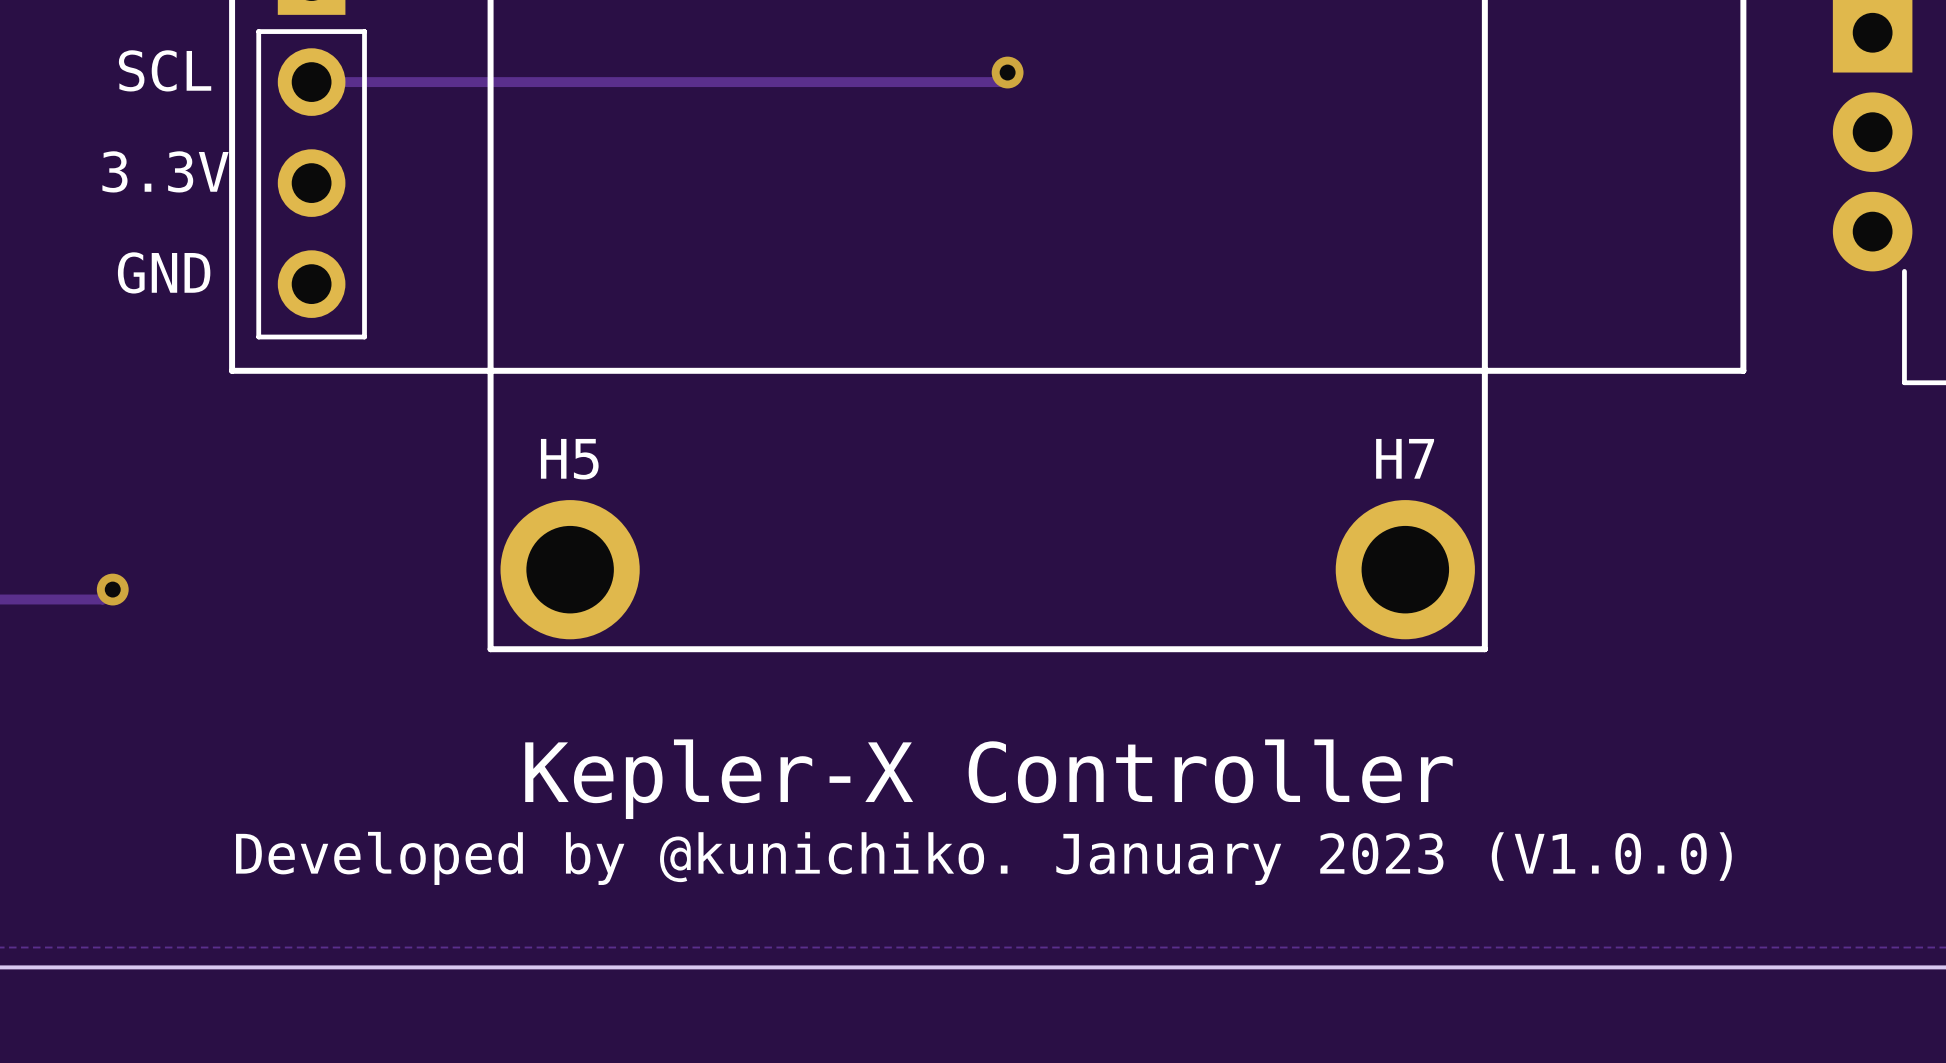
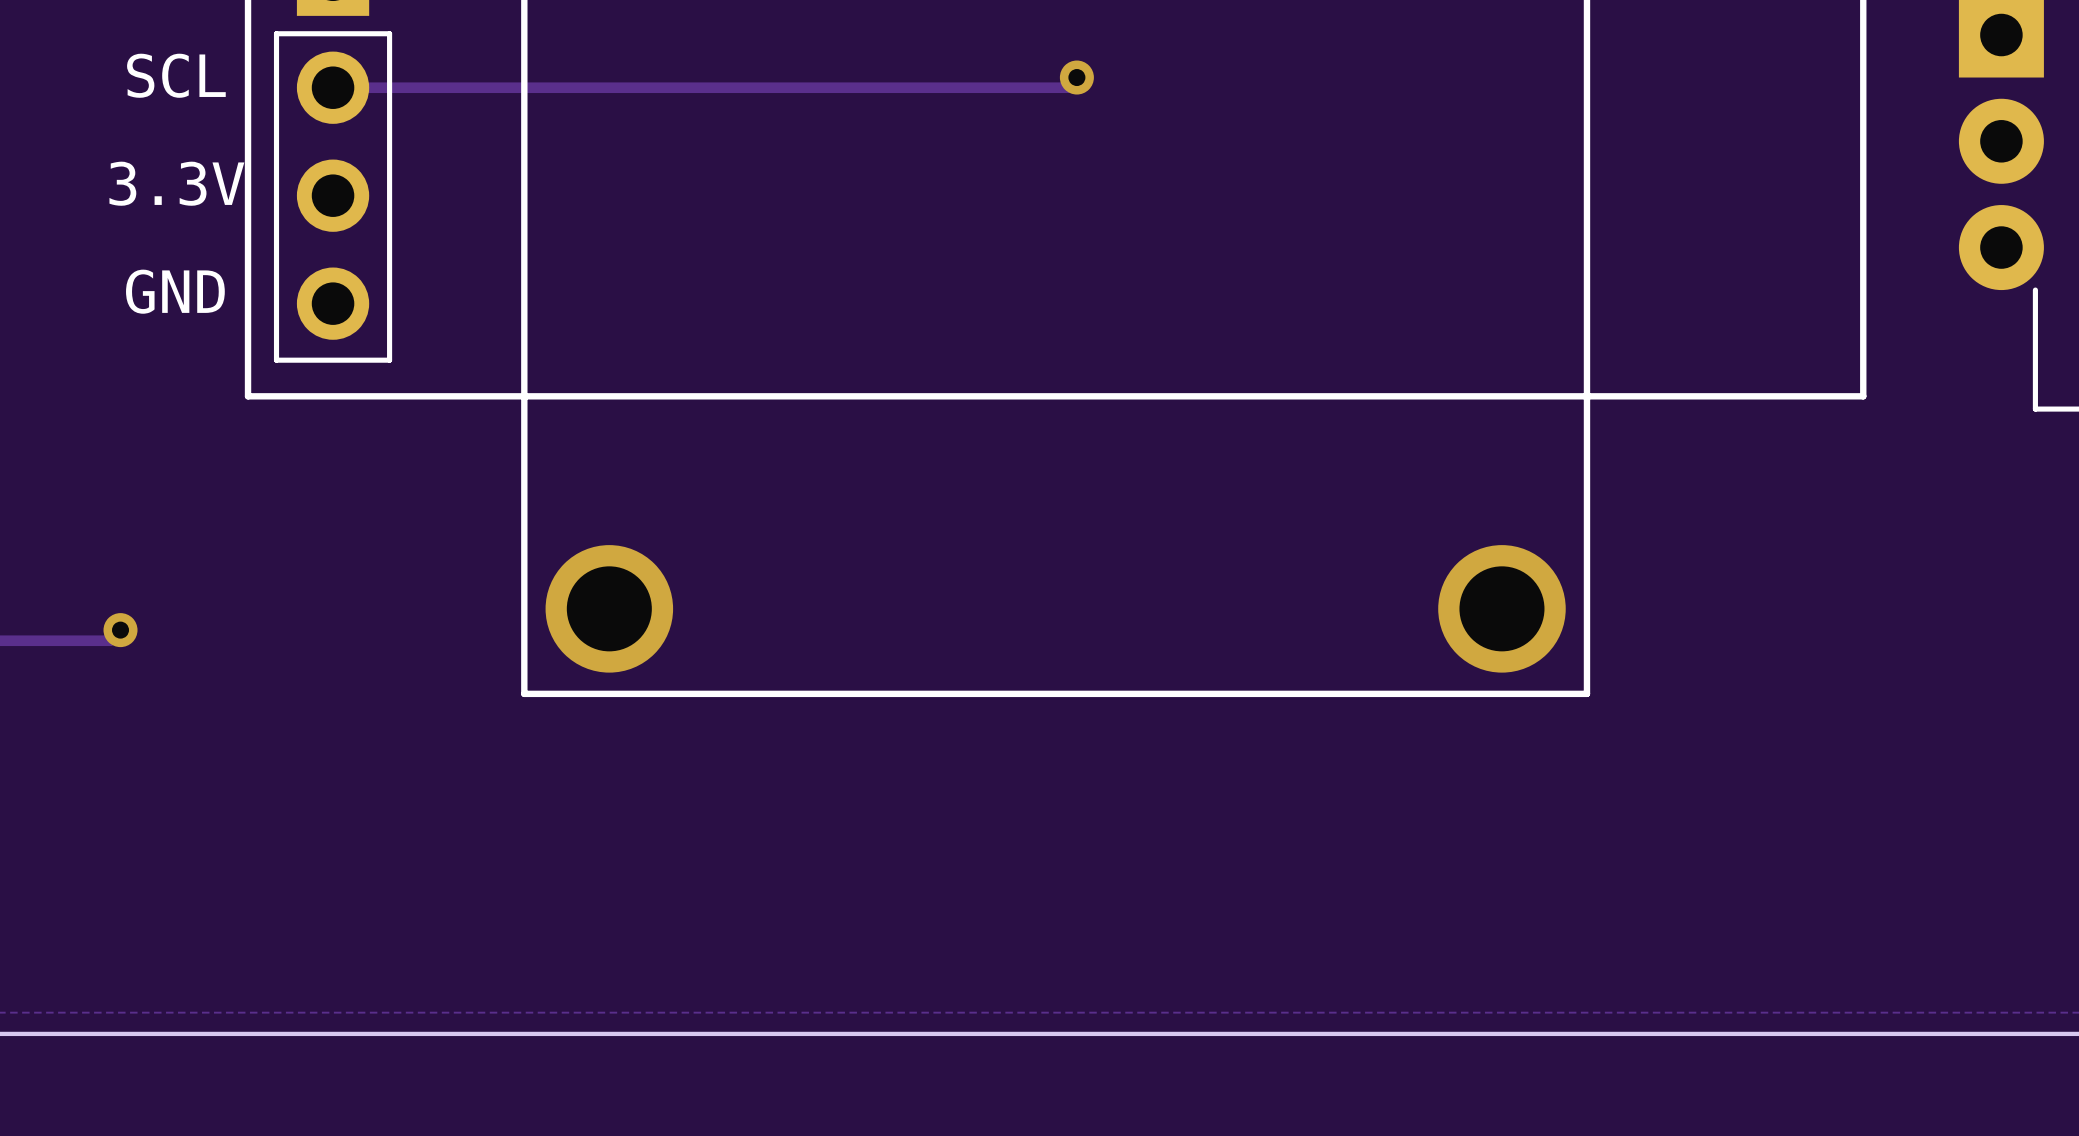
H5: (570, 569) -> none
via: none -> (609, 608)
H7: (1405, 569) -> none
via: none -> (1501, 608)
text: Kepler-X Controller (988, 779) -> none
text: Developed by @kunichiko. January 2023 (V1.0.0) (983, 858) -> none

